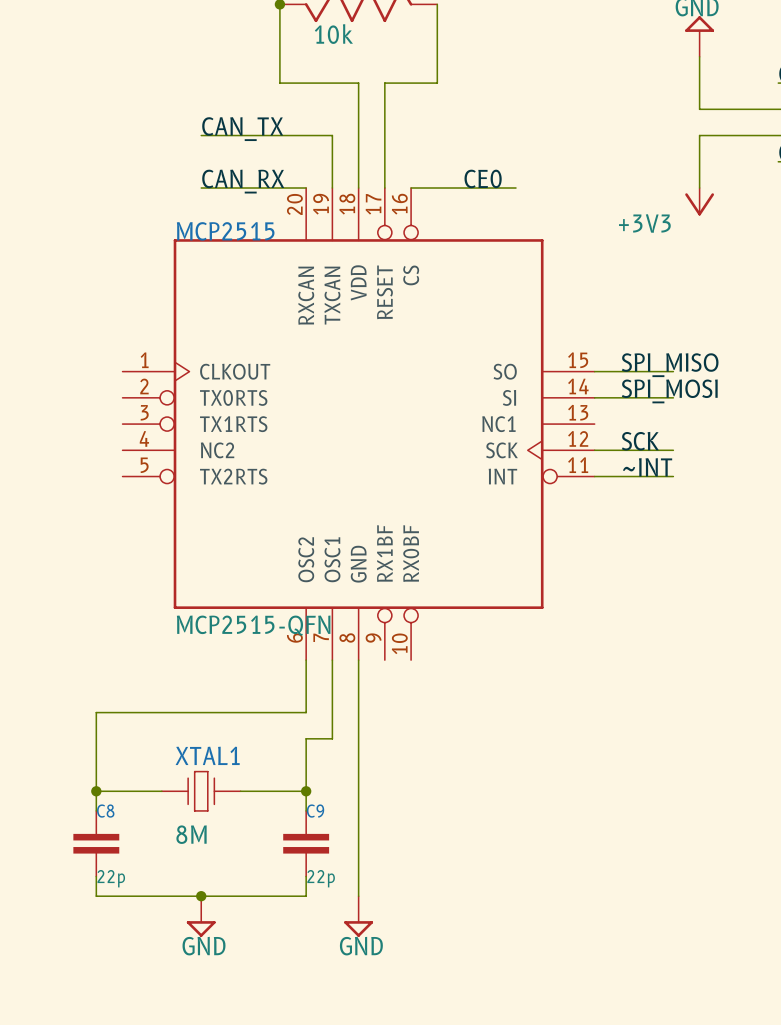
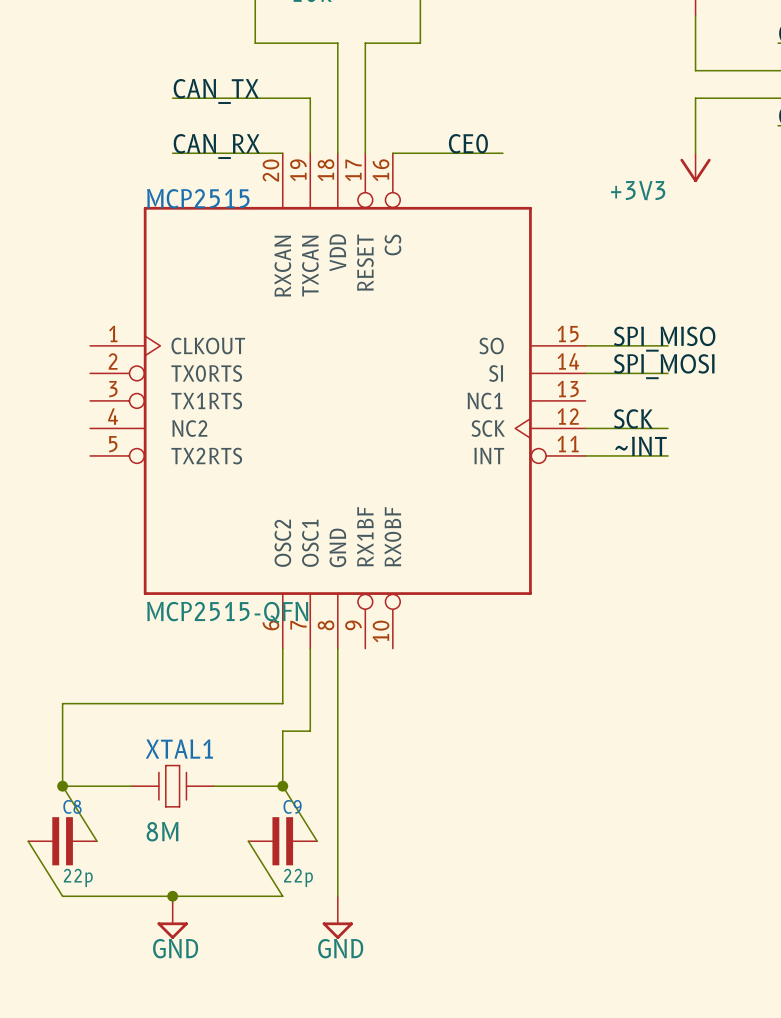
wire: (96, 791) (96, 810) -> (62, 786) (97, 841)
wire: (306, 791) (306, 810) -> (282, 786) (317, 841)
C8 rotation: 0° (96, 843) -> 90° clockwise (62, 841)
C9 rotation: 0° (306, 843) -> 90° clockwise (282, 841)
wire: (96, 876) (96, 896) -> (28, 841) (62, 896)
wire: (306, 876) (306, 896) -> (248, 841) (282, 896)

